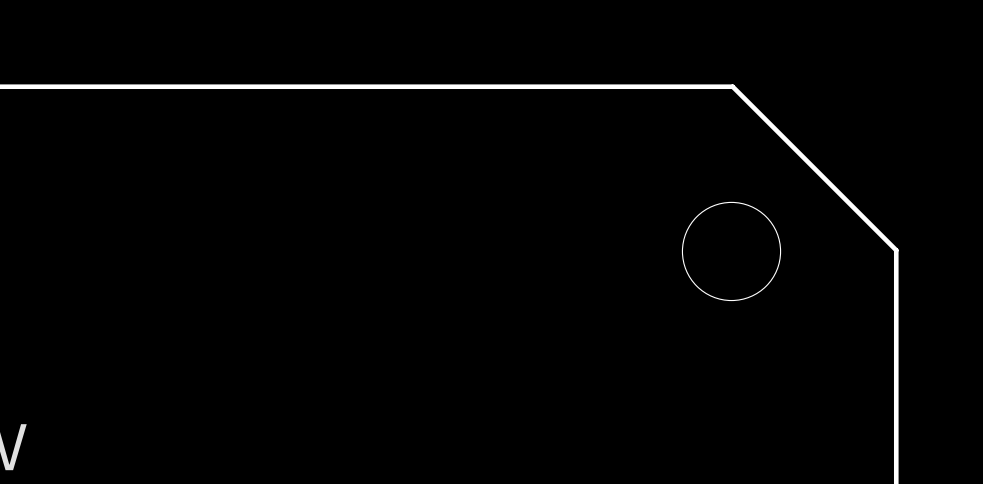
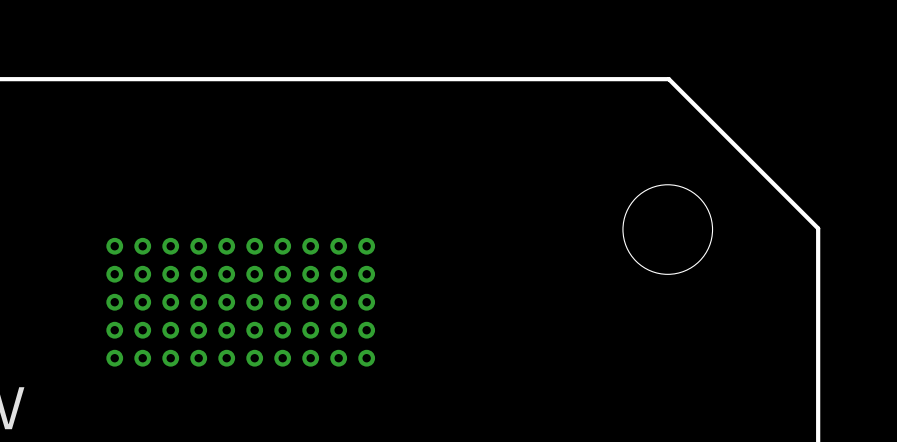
part: none -> (114, 246)
part: none -> (142, 246)
part: none -> (170, 246)
part: none -> (198, 246)
part: none -> (226, 246)
part: none -> (254, 246)
part: none -> (282, 246)
part: none -> (310, 246)
part: none -> (338, 246)
part: none -> (366, 246)
part: none -> (114, 274)
part: none -> (142, 274)
part: none -> (170, 274)
part: none -> (198, 274)
part: none -> (226, 274)
part: none -> (254, 274)
part: none -> (282, 274)
part: none -> (310, 274)
part: none -> (338, 274)
part: none -> (366, 274)
part: none -> (114, 302)
part: none -> (142, 302)
part: none -> (170, 302)
part: none -> (198, 302)
part: none -> (226, 302)
part: none -> (254, 302)
part: none -> (282, 302)
part: none -> (310, 302)
part: none -> (338, 302)
part: none -> (366, 302)
part: none -> (114, 330)
part: none -> (142, 330)
part: none -> (170, 330)
part: none -> (198, 330)
part: none -> (226, 330)
part: none -> (254, 330)
part: none -> (282, 330)
part: none -> (310, 330)
part: none -> (338, 330)
part: none -> (366, 330)
part: none -> (114, 358)
part: none -> (142, 358)
part: none -> (170, 358)
part: none -> (198, 358)
part: none -> (226, 358)
part: none -> (254, 358)
part: none -> (282, 358)
part: none -> (310, 358)
part: none -> (338, 358)
part: none -> (366, 358)

